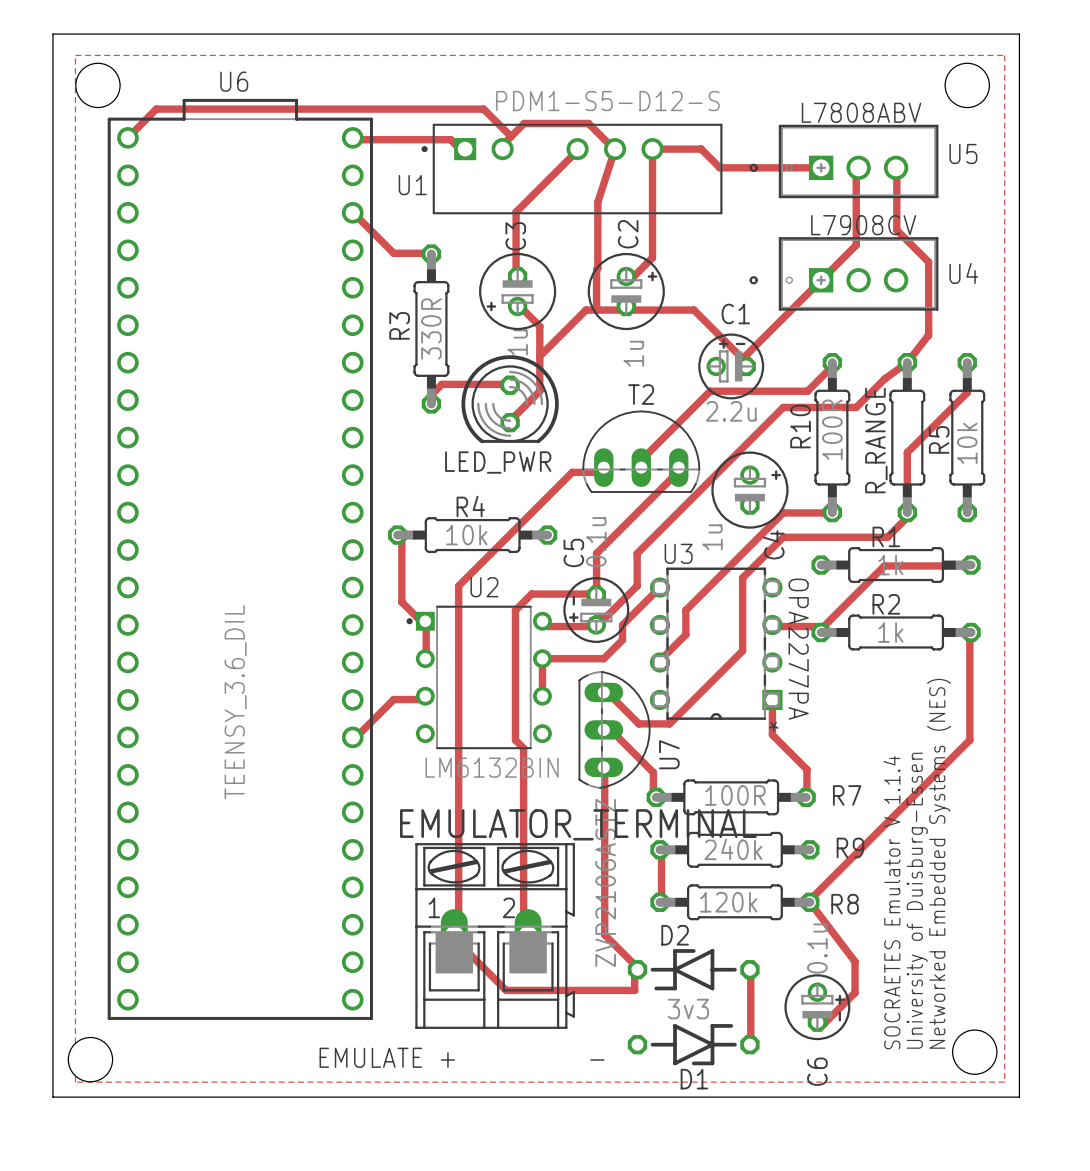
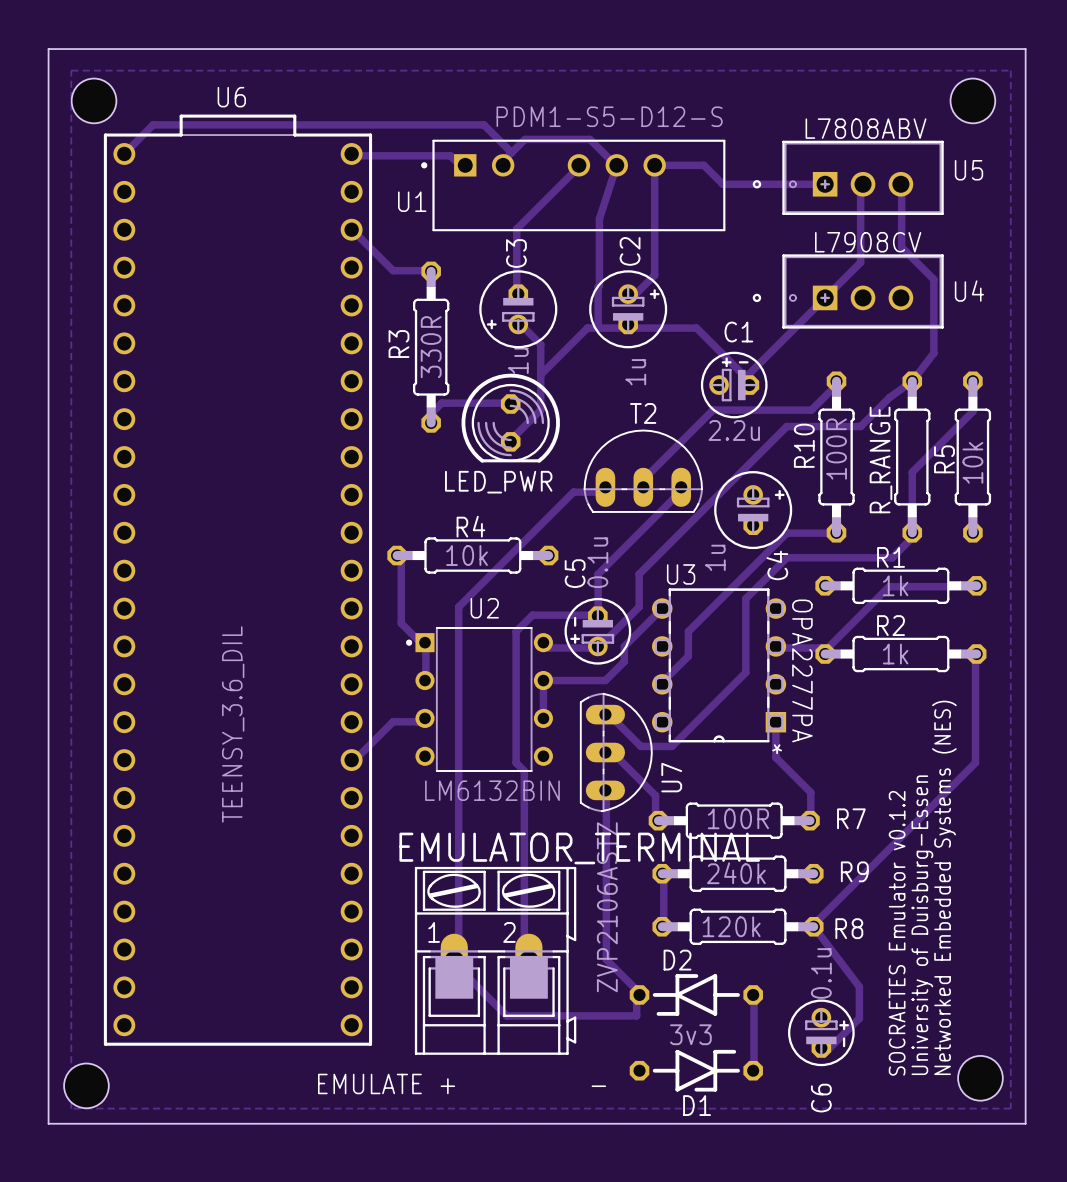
text: SOCRAETES Emulator V 1.1.4 (891, 902) -> SOCRAETES Emulator v0.1.2 (897, 933)

